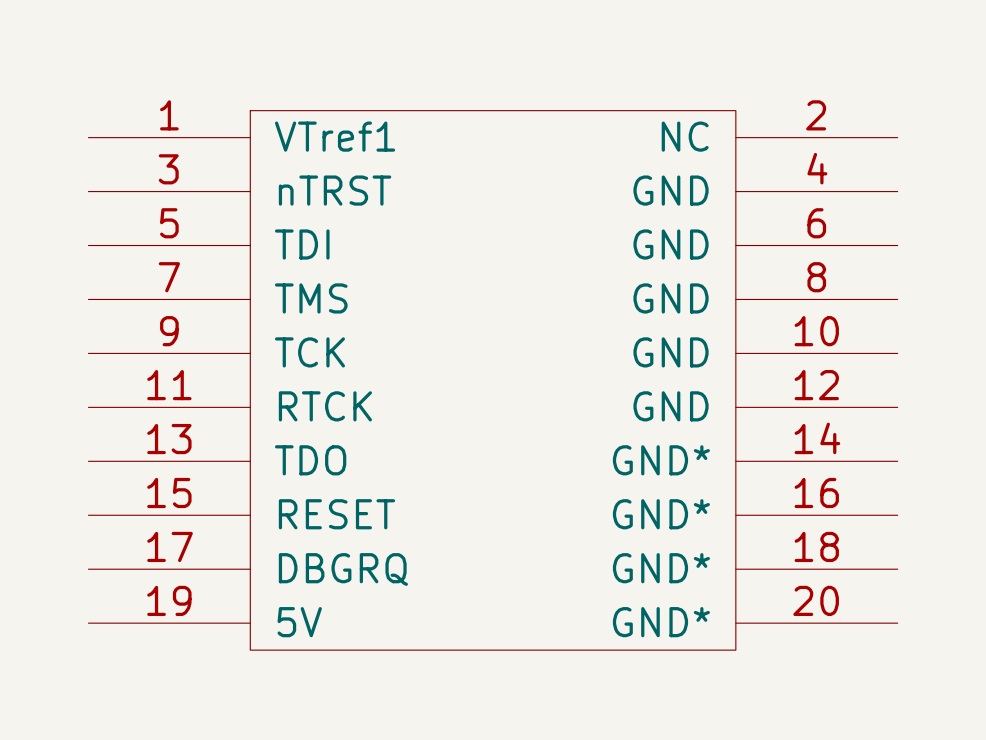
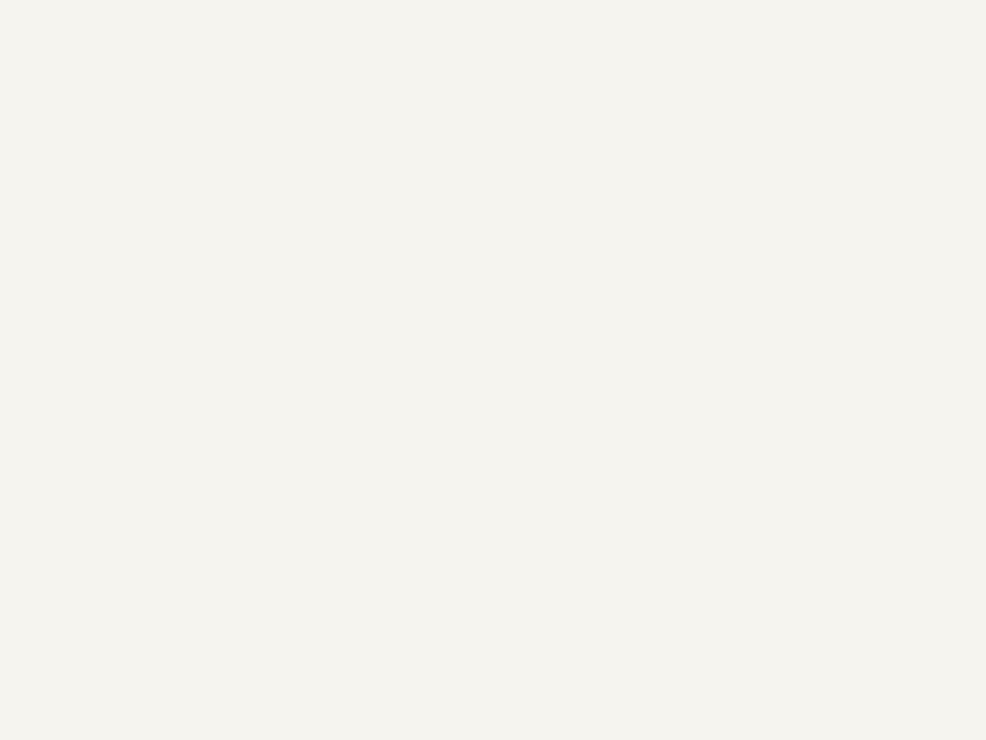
part: (493, 380) -> none

